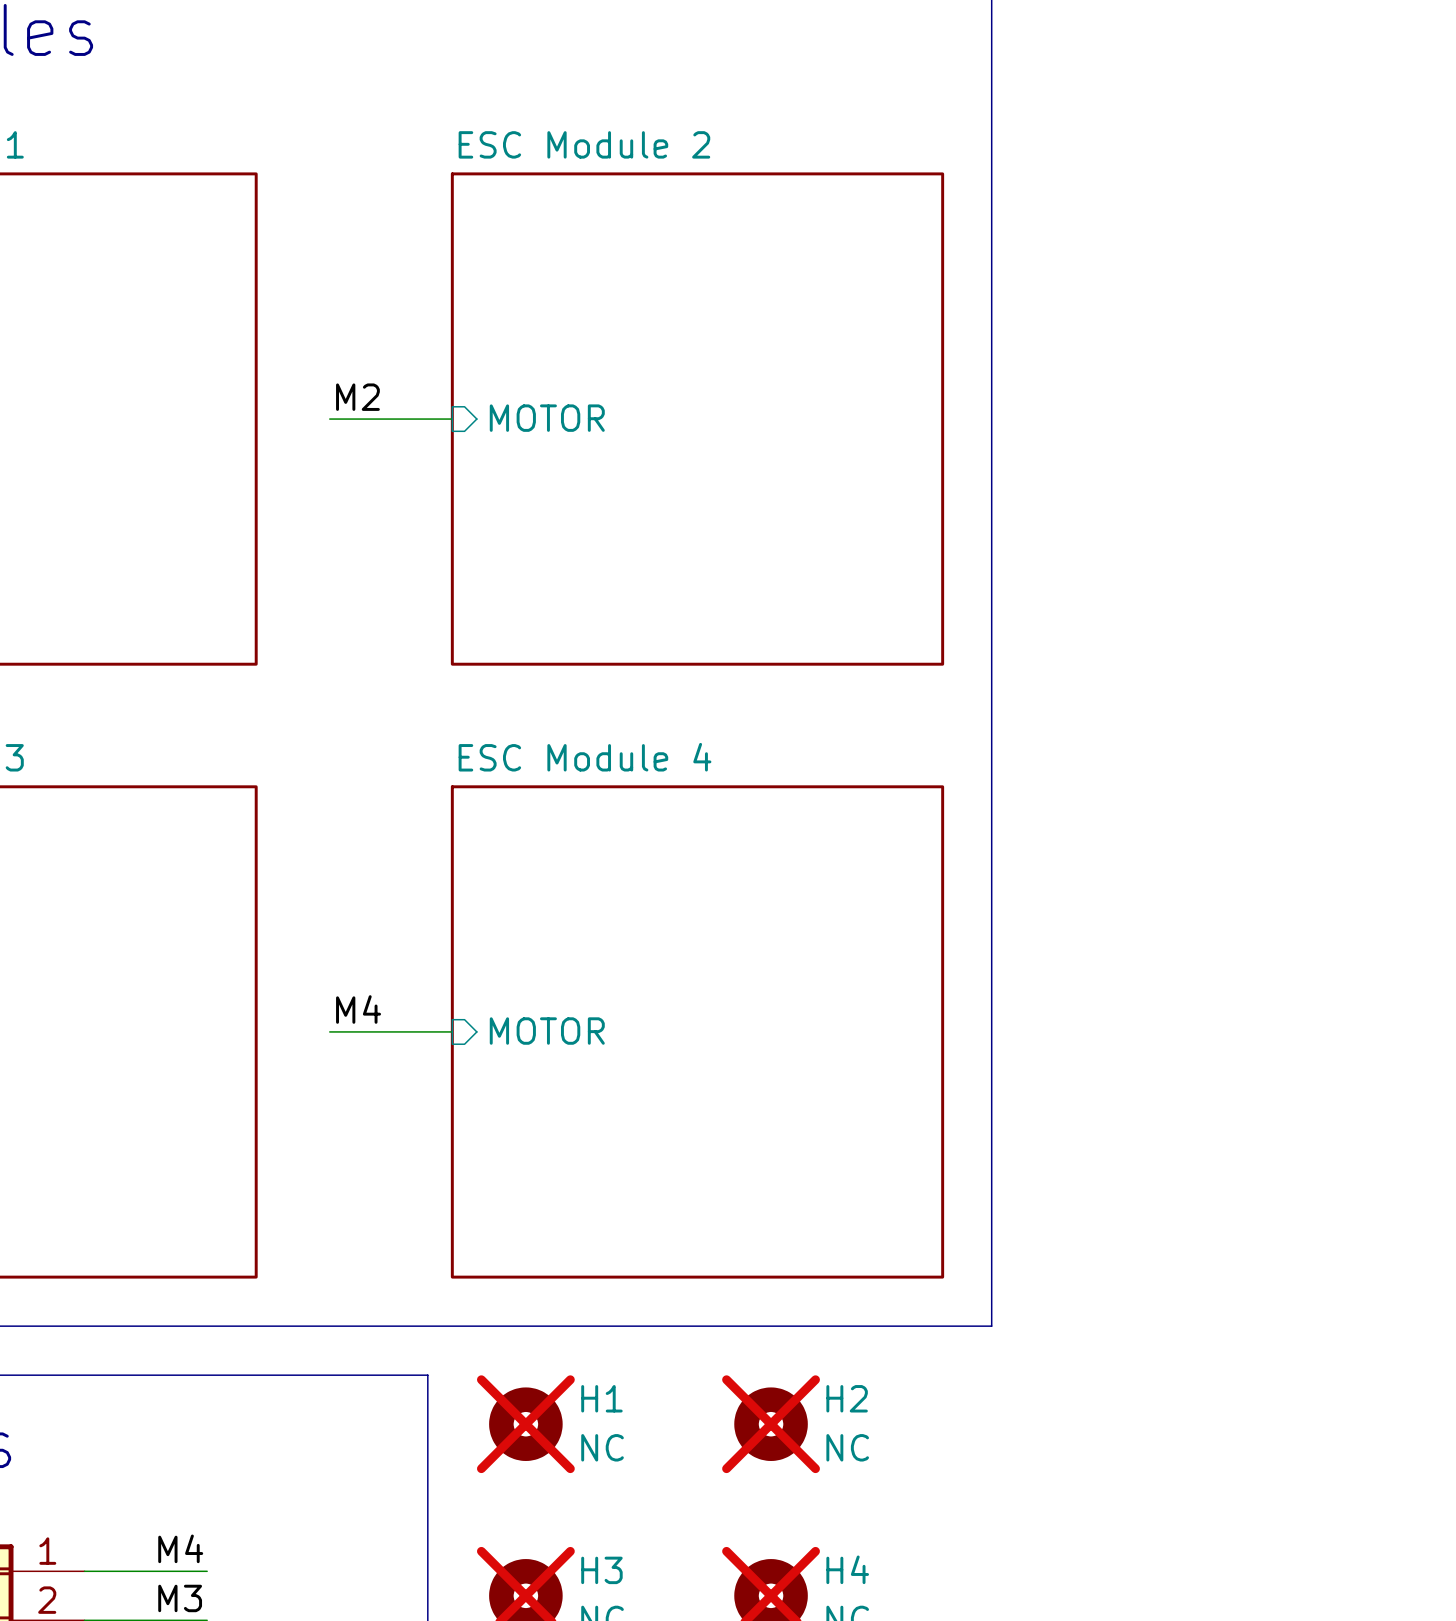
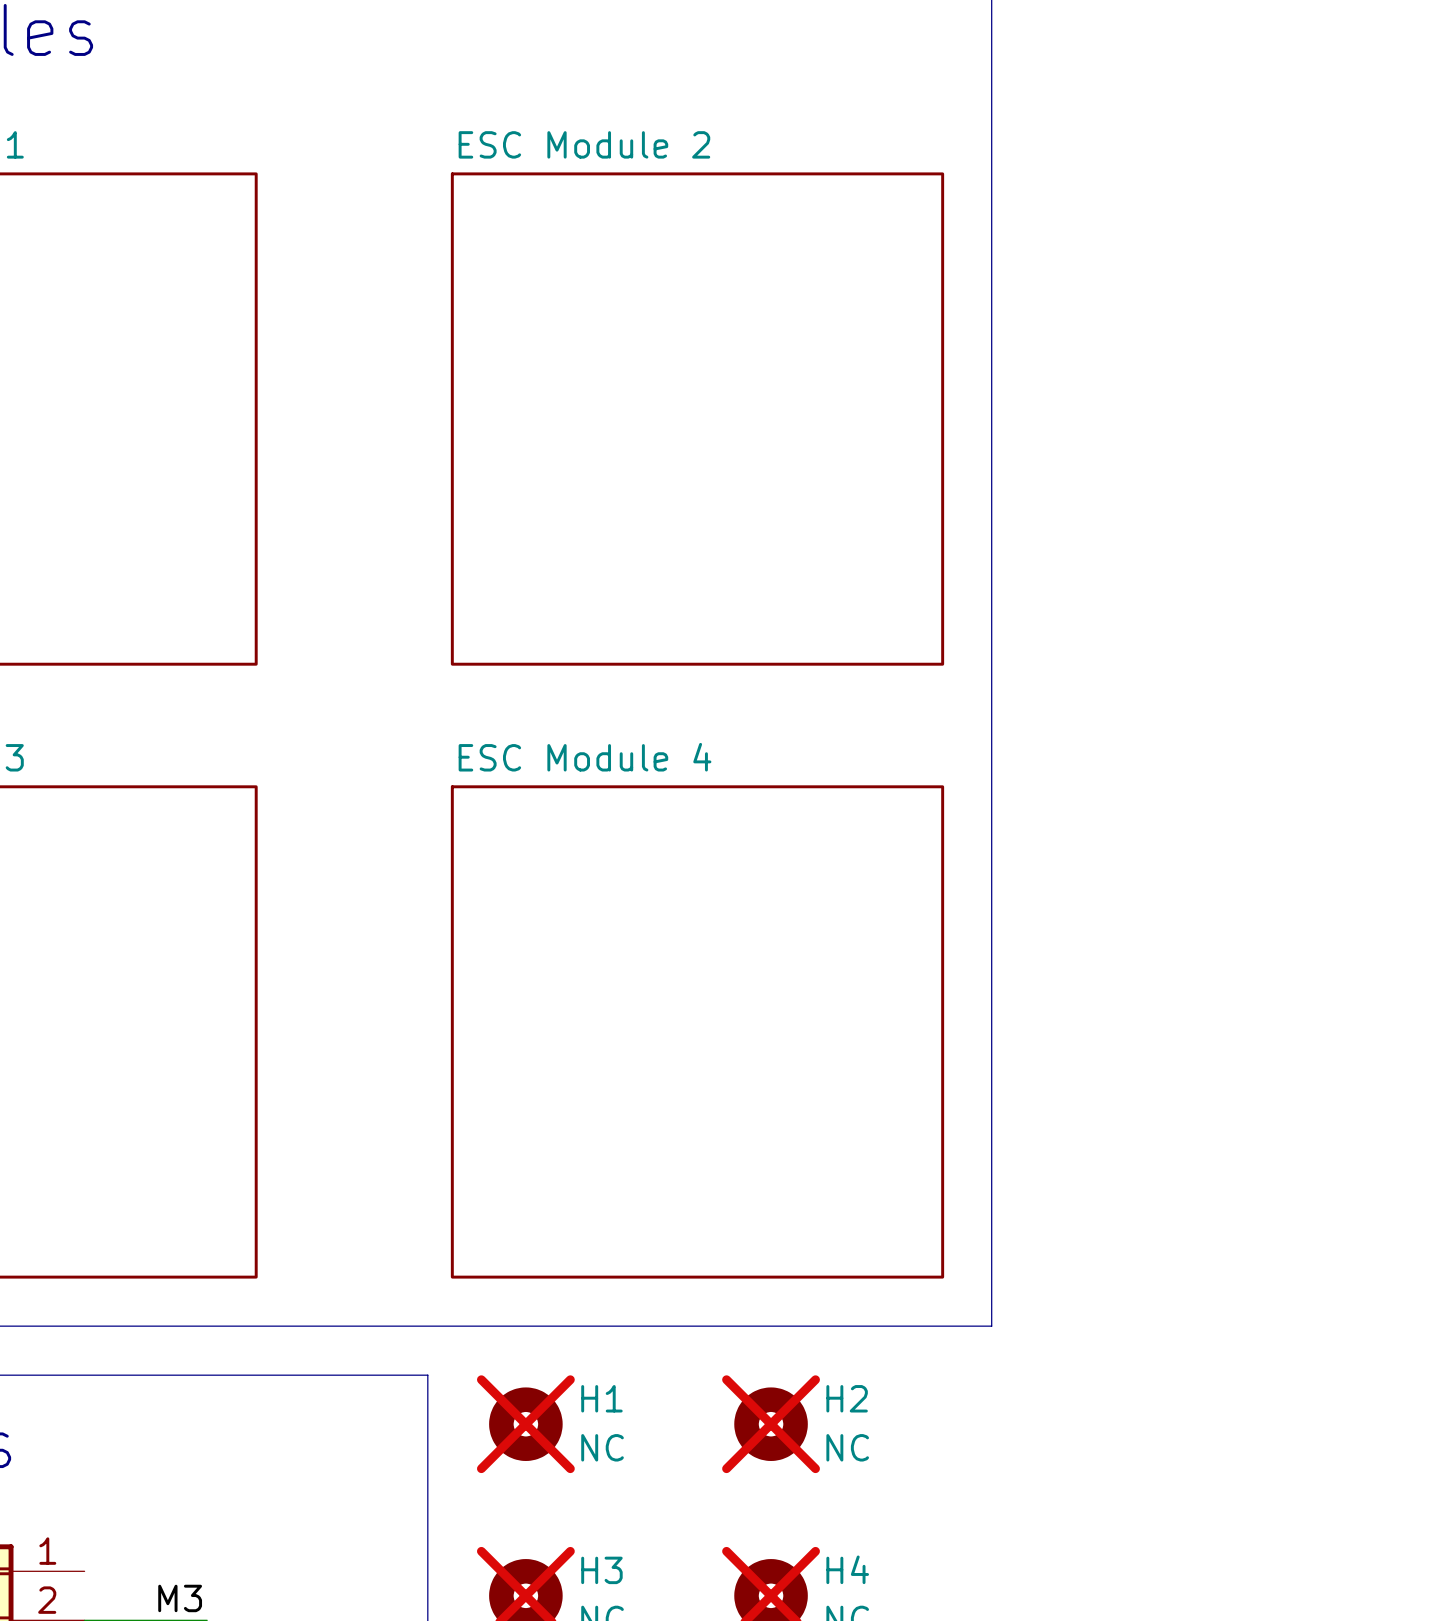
label: M2 (357, 397) -> none
sheet pin: MOTOR (547, 418) -> none
wire: (329, 419) (452, 419) -> none
label: M4 (358, 1009) -> none
wire: (329, 1031) (452, 1031) -> none
sheet pin: MOTOR (547, 1031) -> none
label: M4 (180, 1548) -> none
wire: (84, 1571) (207, 1571) -> none

